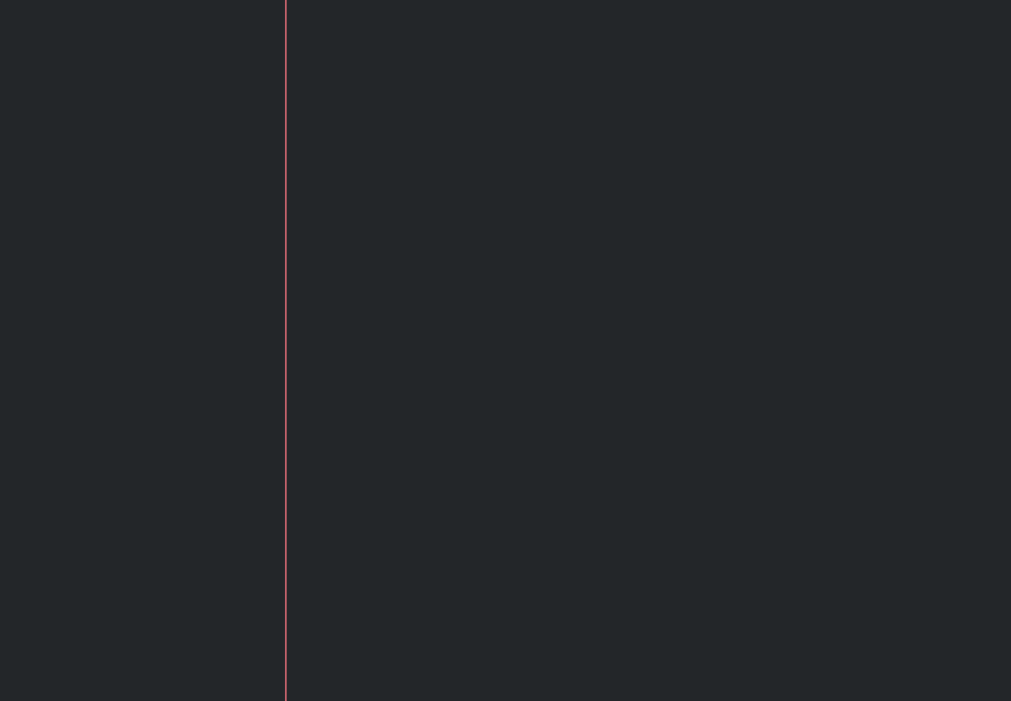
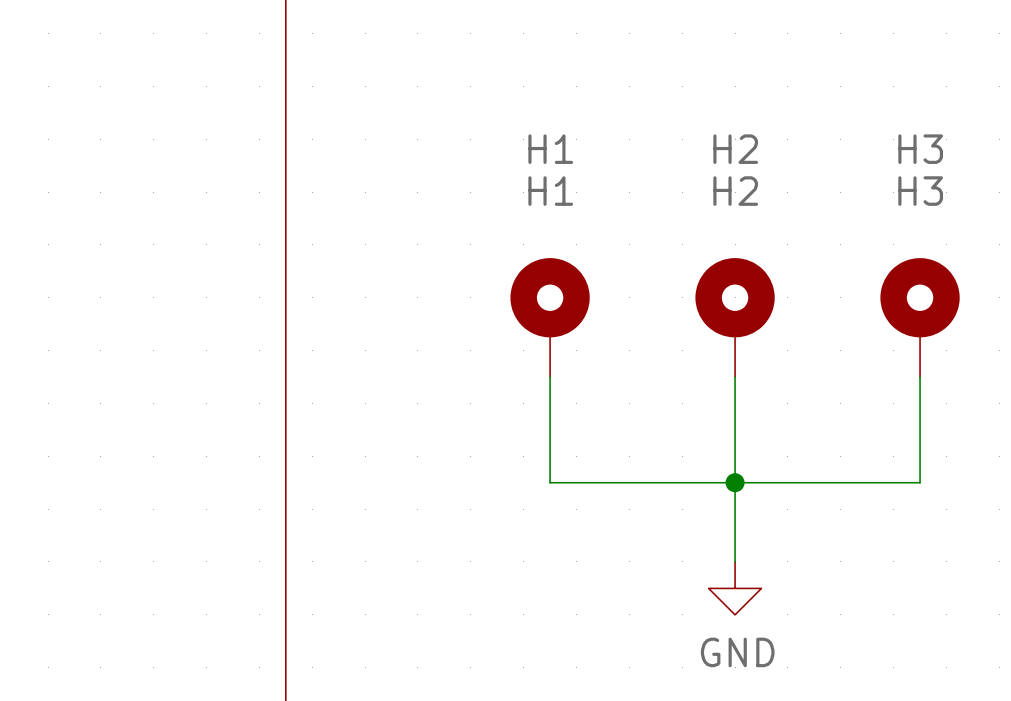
H1: none -> H1 (550, 317)
H2: none -> H2 (735, 317)
H3: none -> H3 (920, 317)
wire: none -> (550, 377) (550, 482) (920, 482) (920, 377)
wire: none -> (735, 377) (735, 561)
junction: none -> (735, 482)
power symbol: none -> GND (735, 588)

